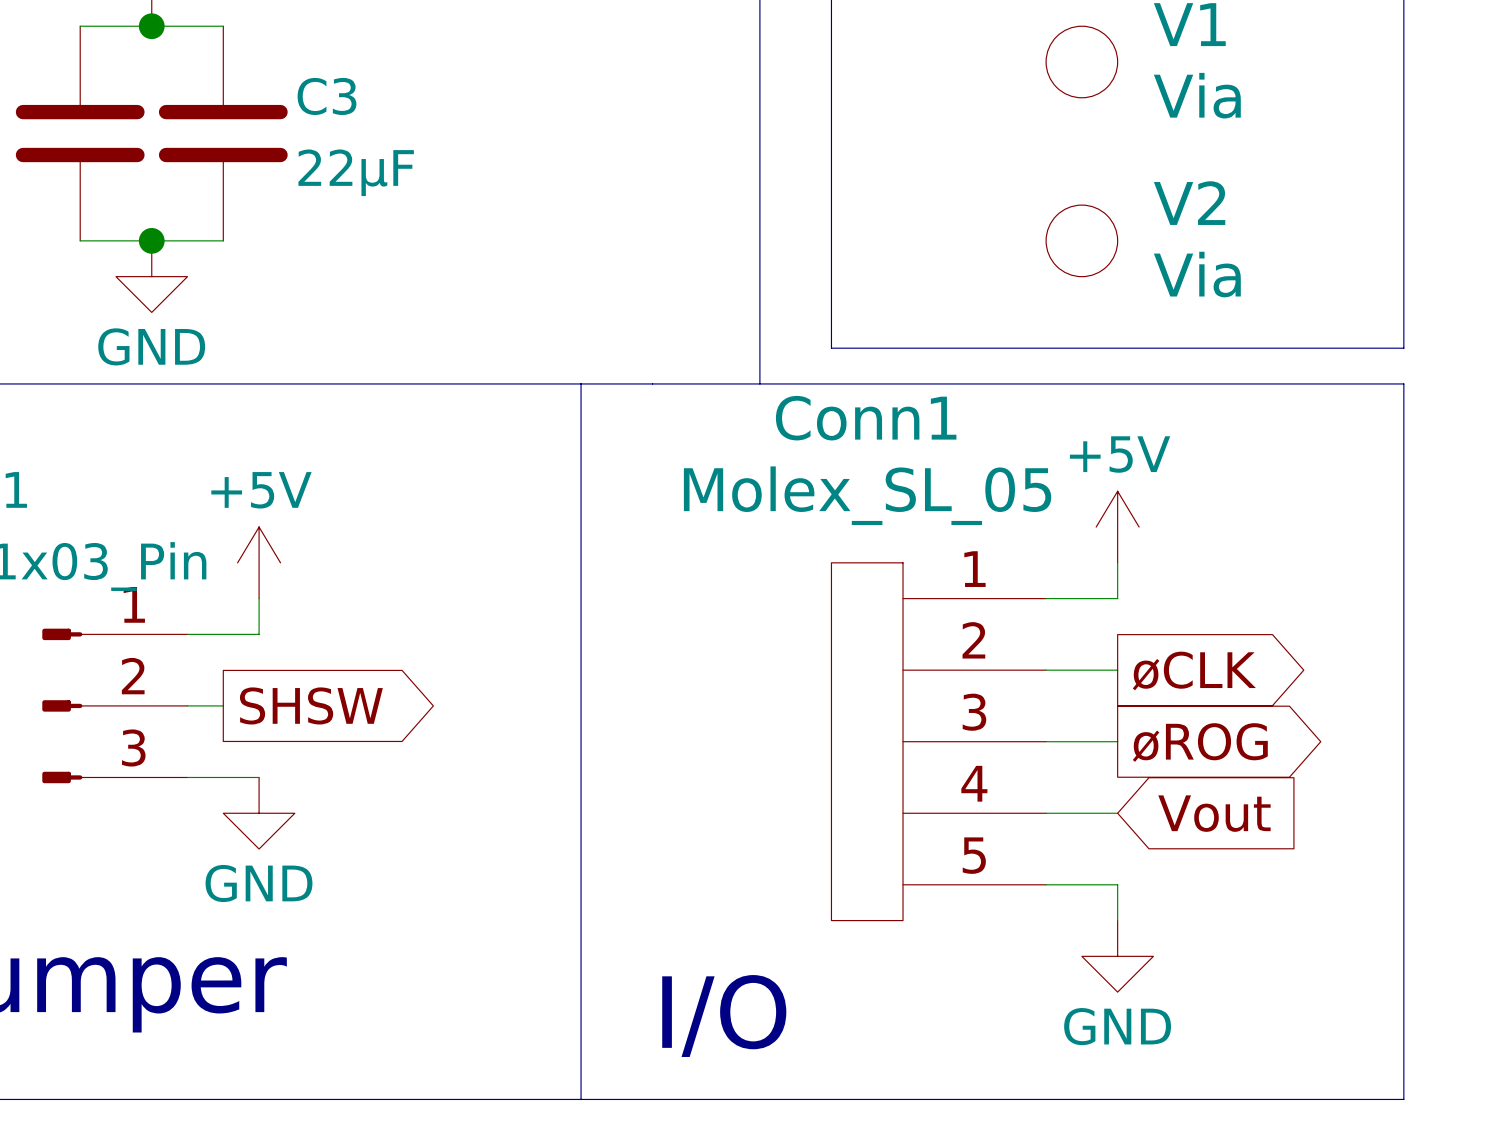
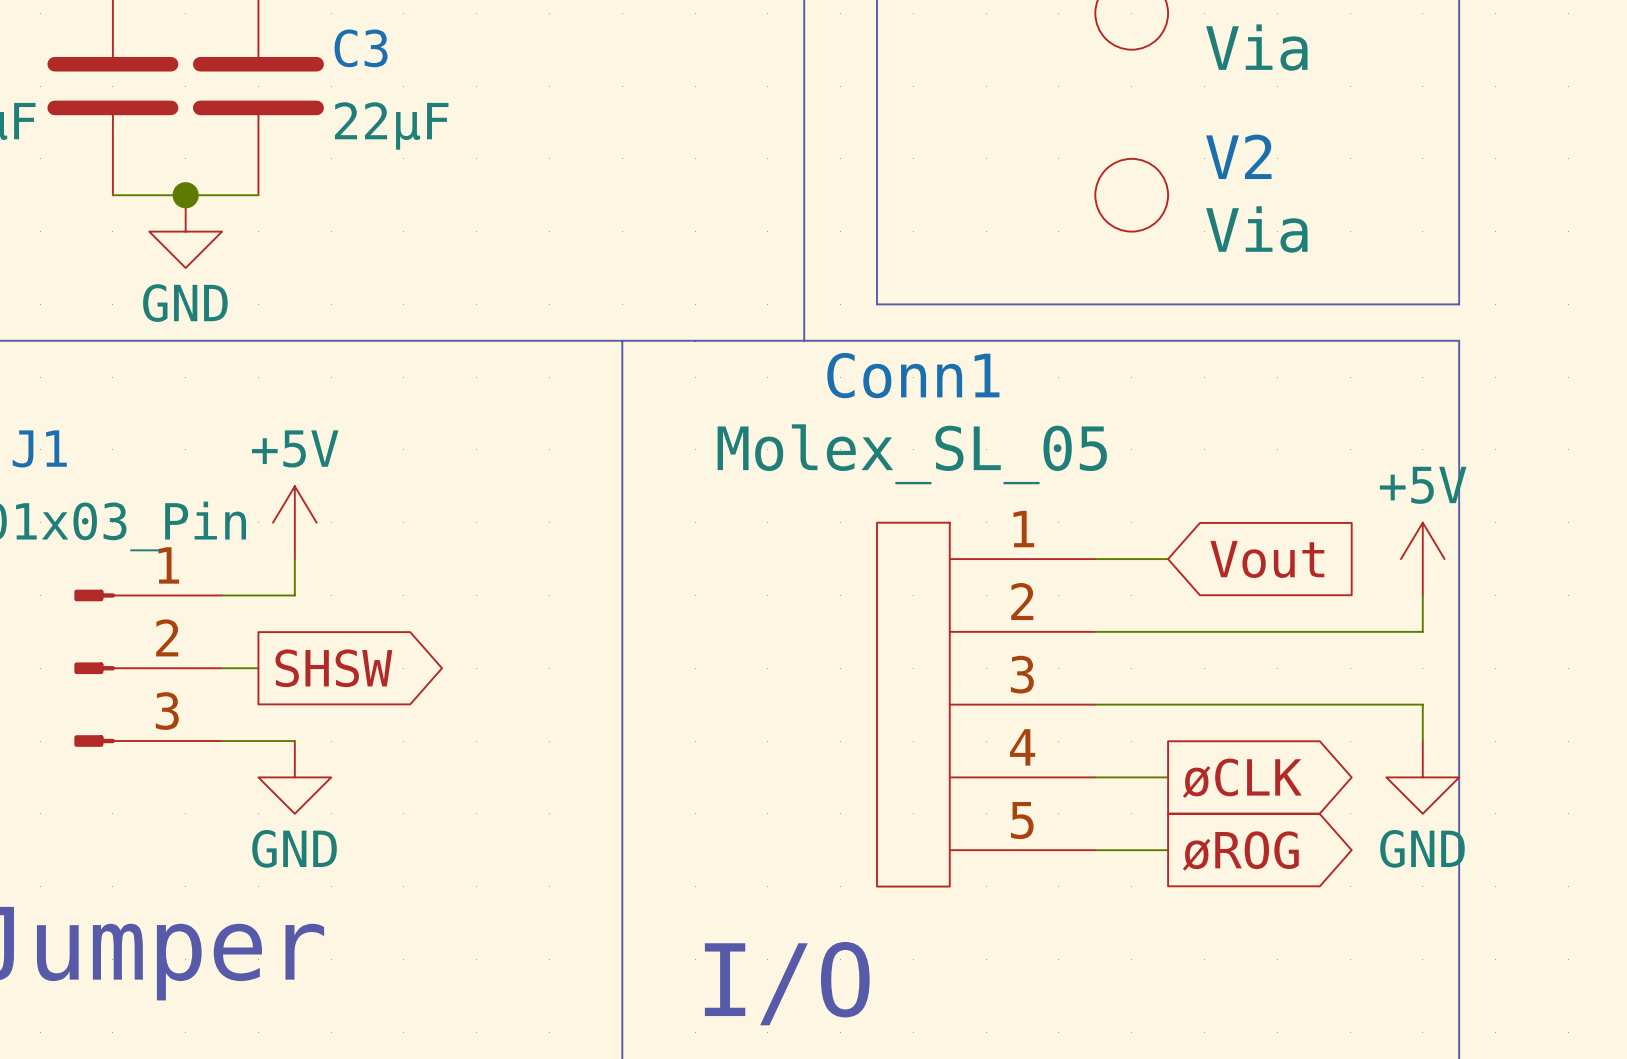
power symbol position: +5V (1117, 527) -> +5V (1422, 559)
wire: (1117, 562) (1117, 598) -> none
global label: none -> Vout (1267, 559)
wire: none -> (1422, 595) (1422, 631) (1168, 631)
global label: øCLK (1194, 670) -> none
wire: none -> (1168, 704) (1422, 704) (1422, 741)
global label position: øROG (1200, 742) -> øROG (1240, 851)
global label shape: input (1214, 813) -> output (1242, 778)
global label: Vout (1214, 813) -> øCLK (1242, 778)
power symbol position: GND (1117, 956) -> GND (1422, 777)

